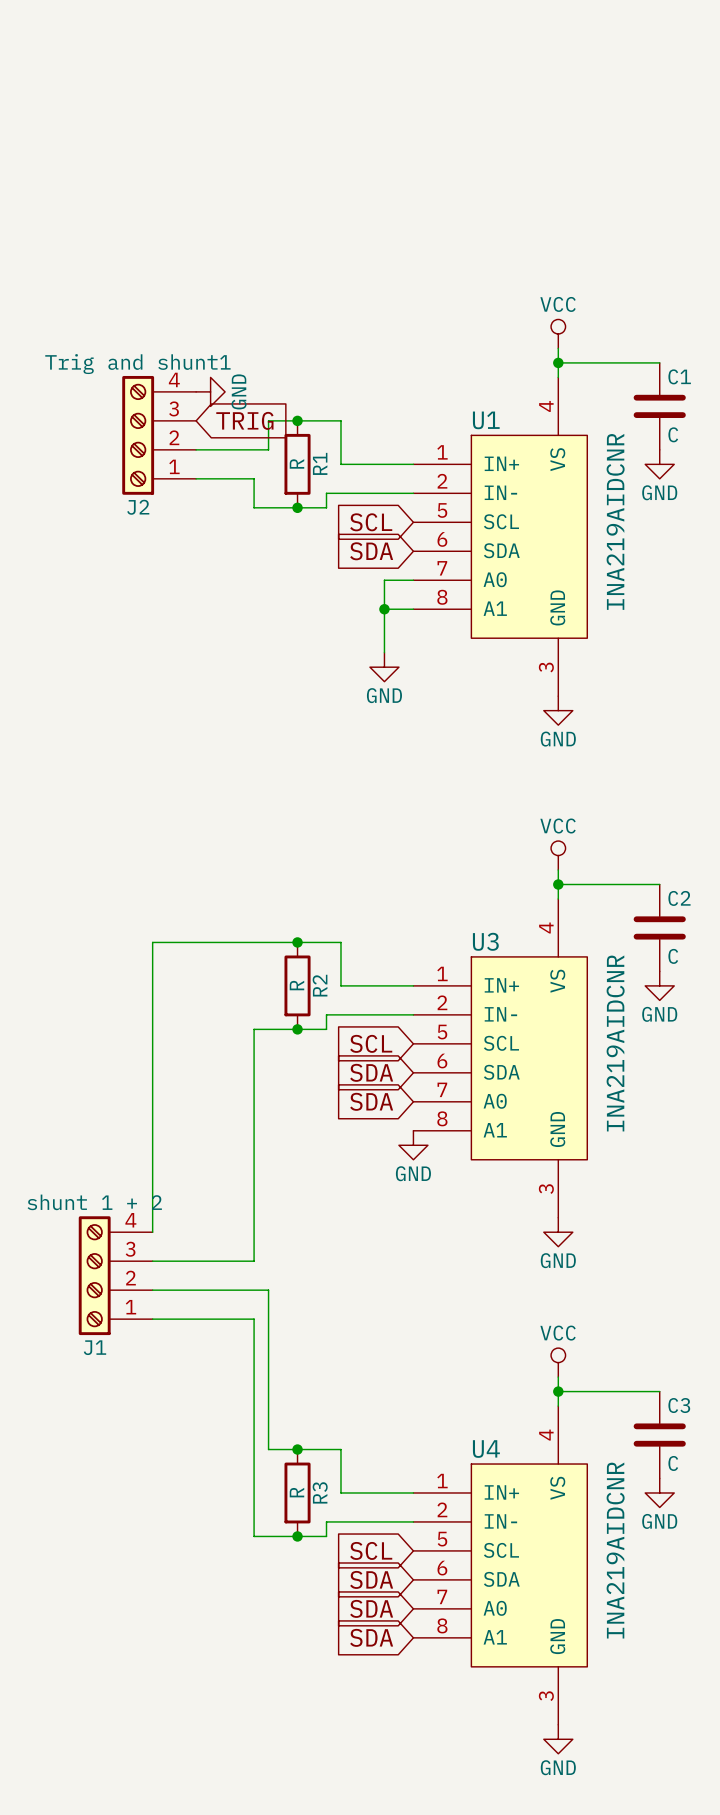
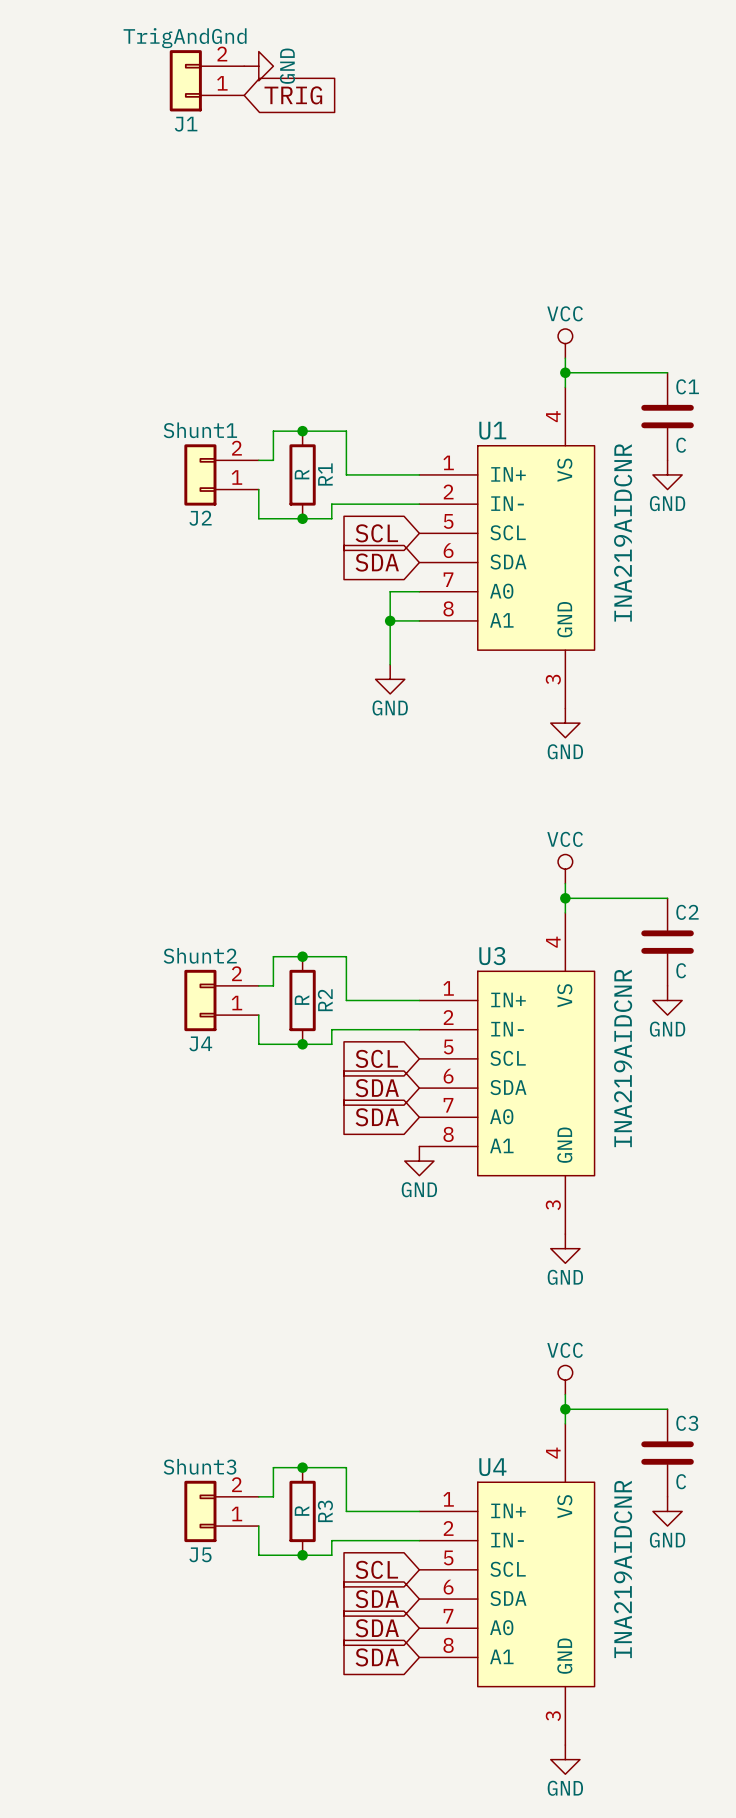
power symbol: none -> GND (258, 66)
global label: none -> TRIG (293, 95)
J2 value: Trig and shunt1 (137, 364) -> Shunt1 (200, 430)
J2 symbol: [122, 375, 197, 495] -> [184, 444, 259, 506]
power symbol: GND (210, 391) -> none
global label: TRIG (244, 420) -> none
J2 name position: J2 (138, 507) -> J2 (200, 518)
wire: (268, 942) (152, 942) (152, 1232) -> (273, 956) (273, 985) (258, 985)
J4: none -> Shunt2 (221, 1000)
wire: (254, 1029) (254, 1261) (152, 1261) -> (258, 1044) (258, 1015)
J1 value: shunt 1 + 2 (94, 1202) -> TrigAndGnd (185, 38)
J1 symbol: [78, 1216, 153, 1336] -> [169, 50, 245, 112]
wire: (152, 1290) (268, 1290) (268, 1449) -> (258, 1496) (273, 1496) (273, 1467)
wire: (152, 1319) (254, 1319) (254, 1507) -> none
J1 name position: J1 (94, 1347) -> J1 (186, 124)
J5: none -> Shunt3 (221, 1511)

